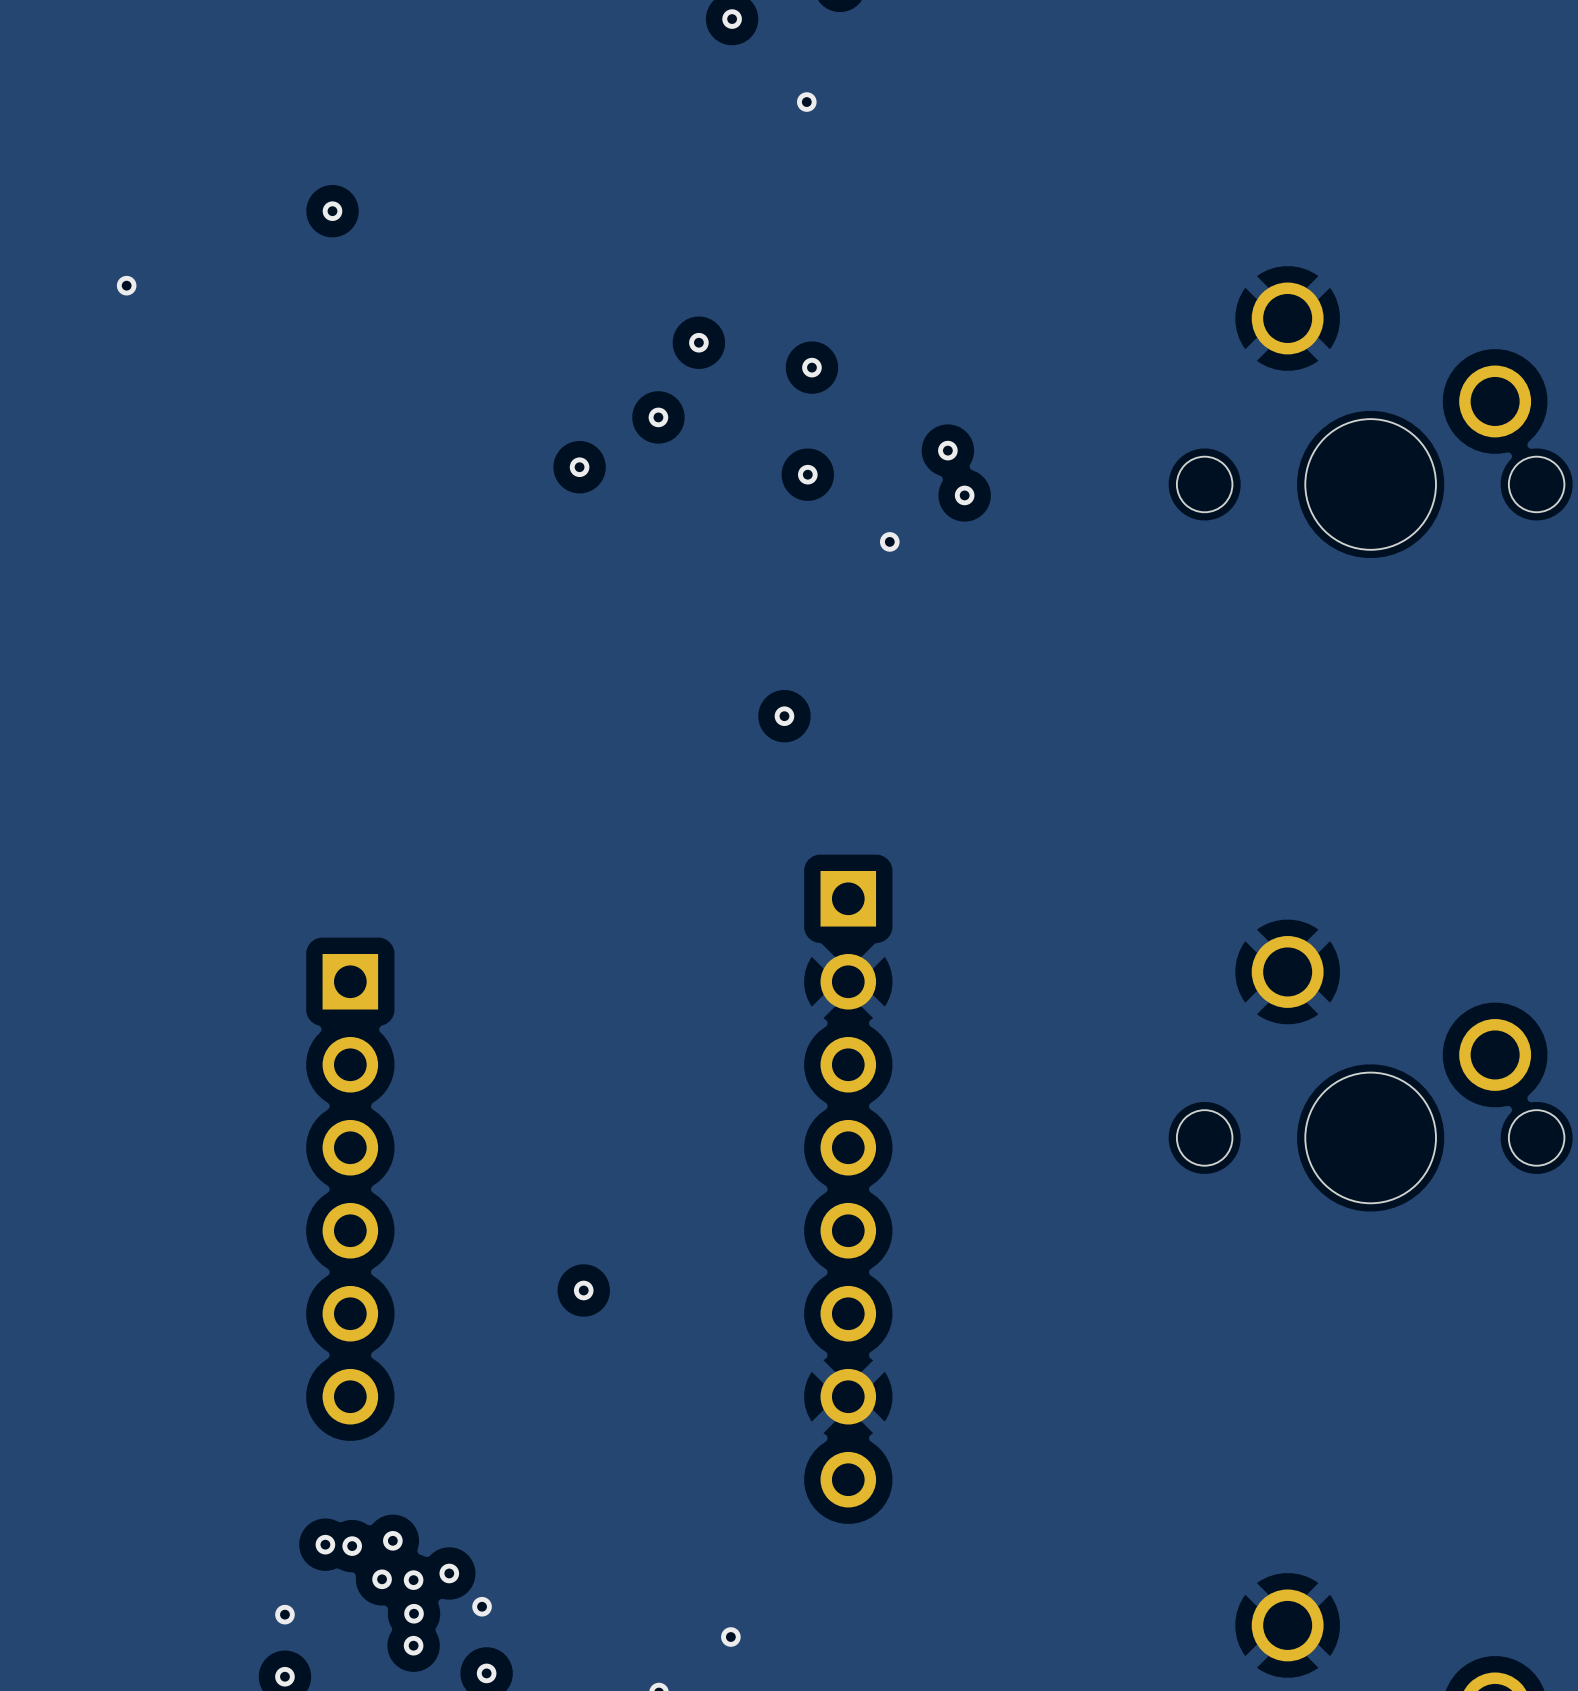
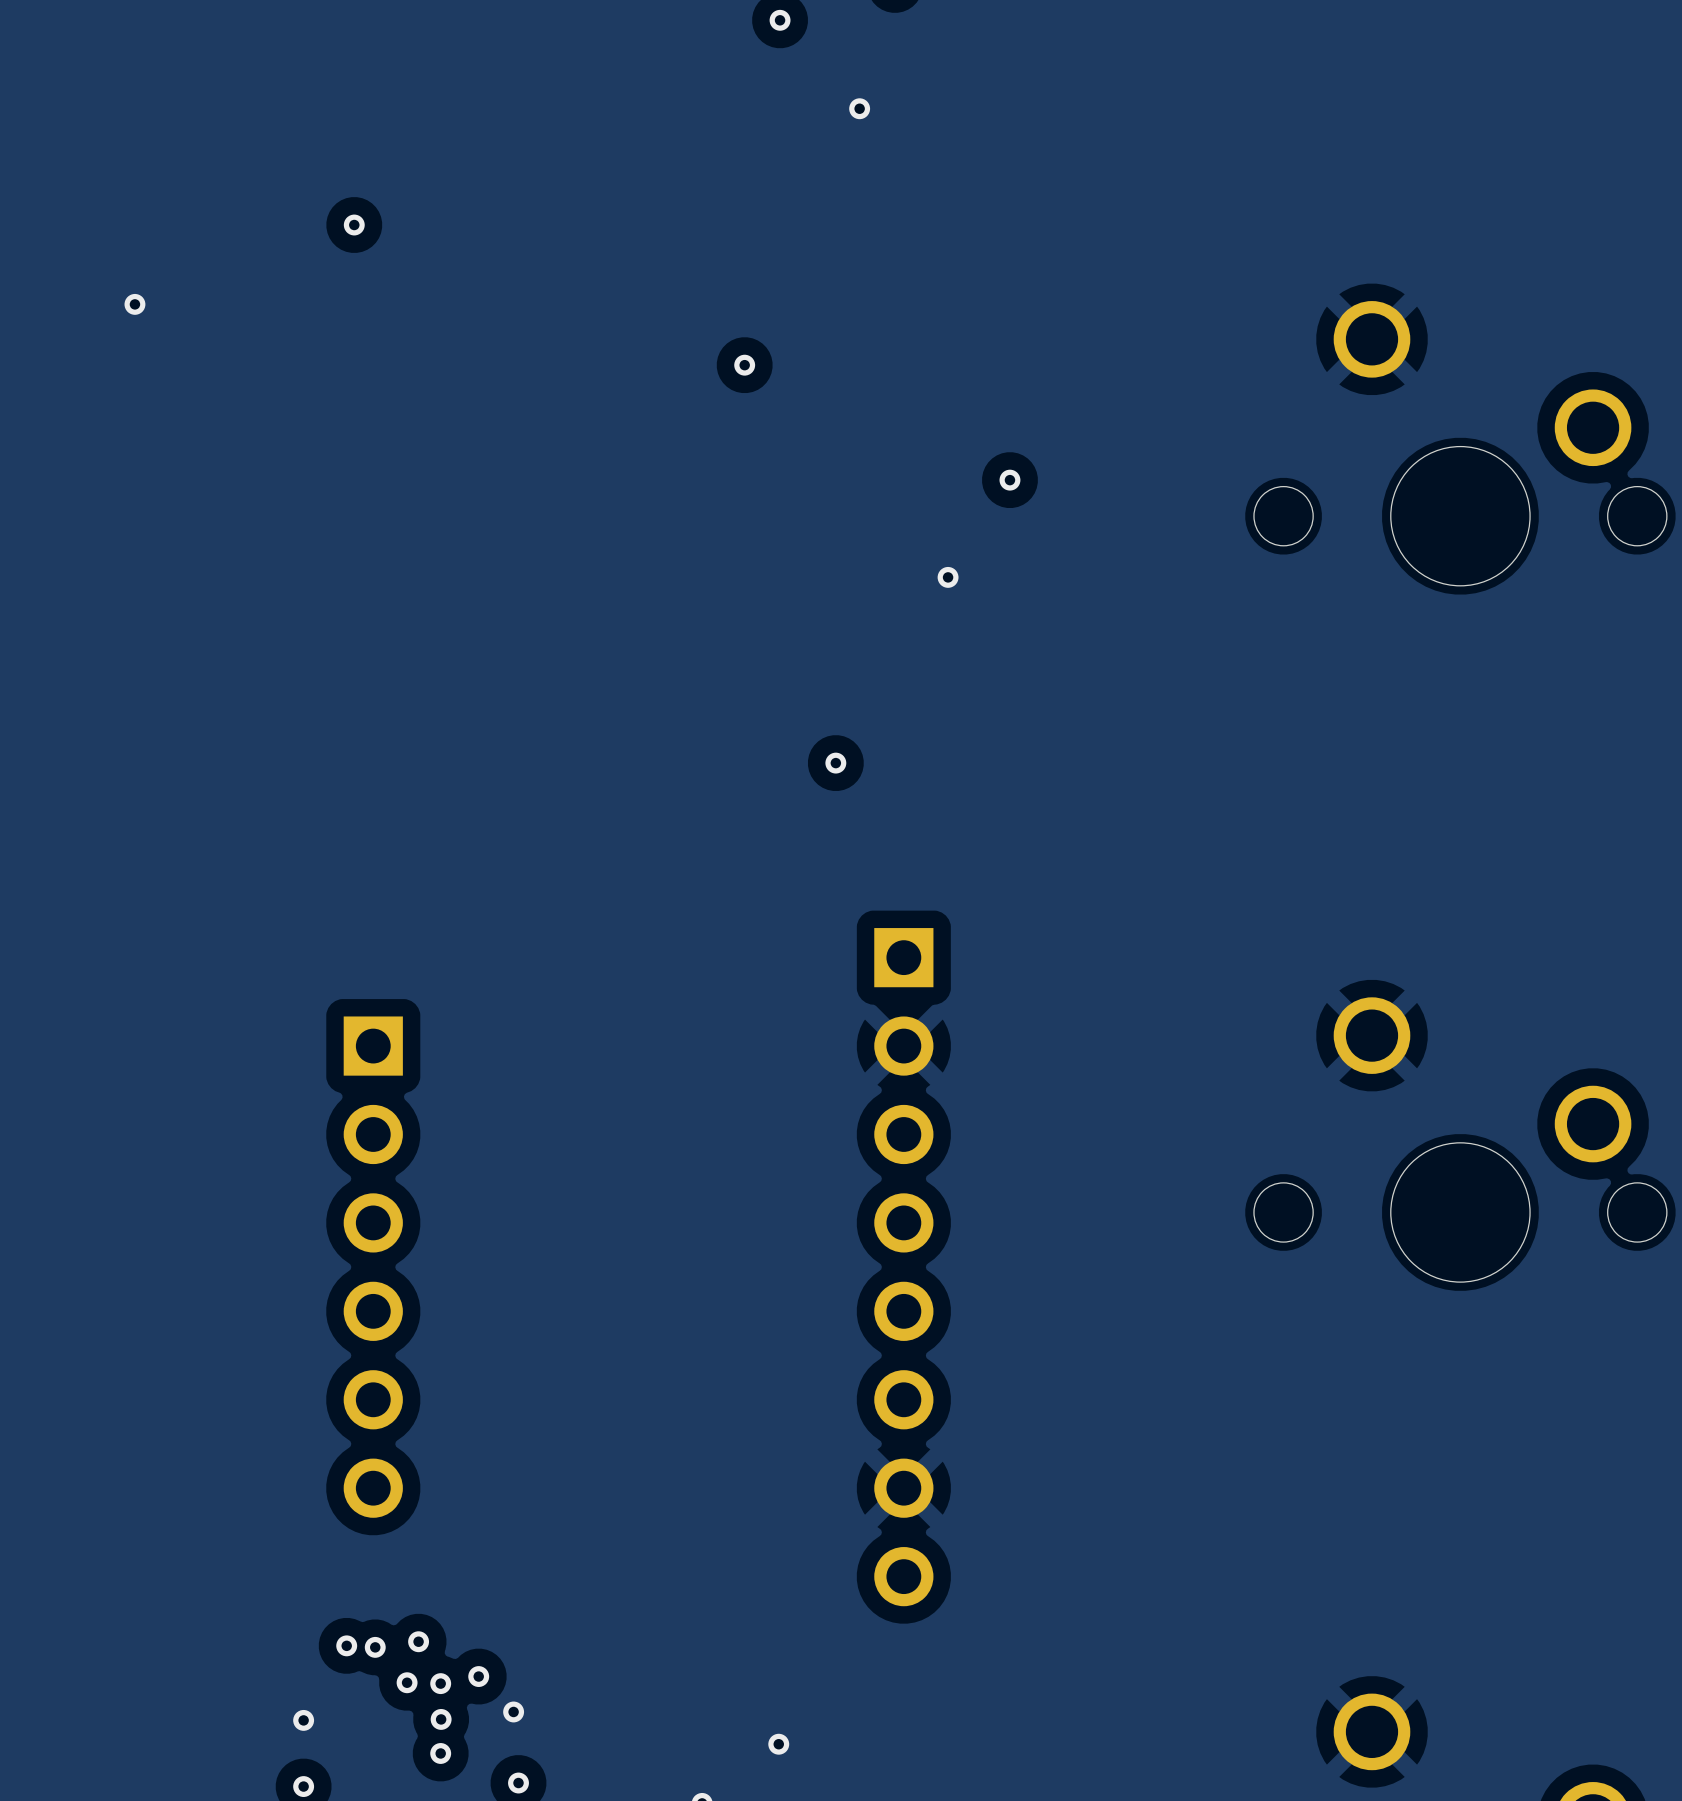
via: (811, 367) -> none
via: (658, 417) -> none
via: (579, 467) -> none
via: (807, 474) -> none
via: (964, 495) -> none
via: (583, 1290) -> none

